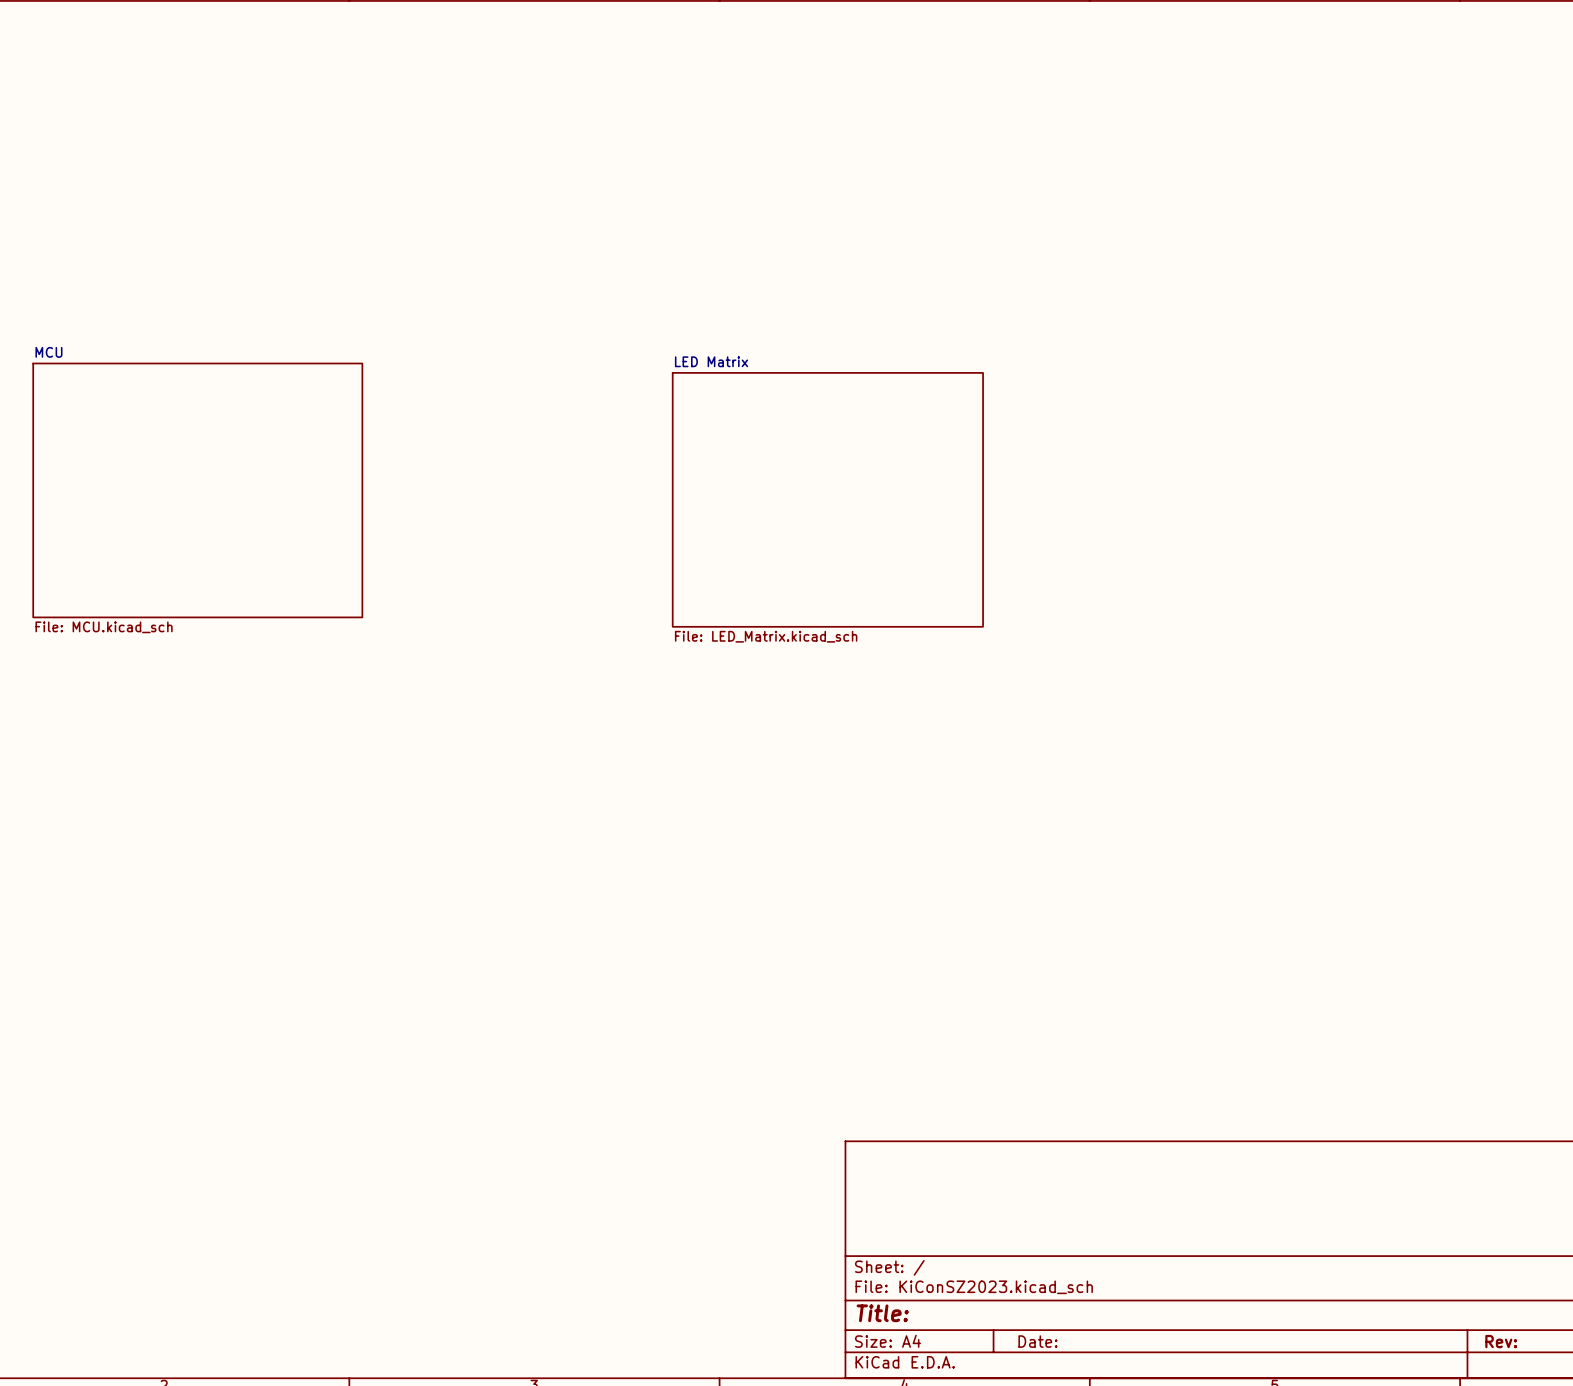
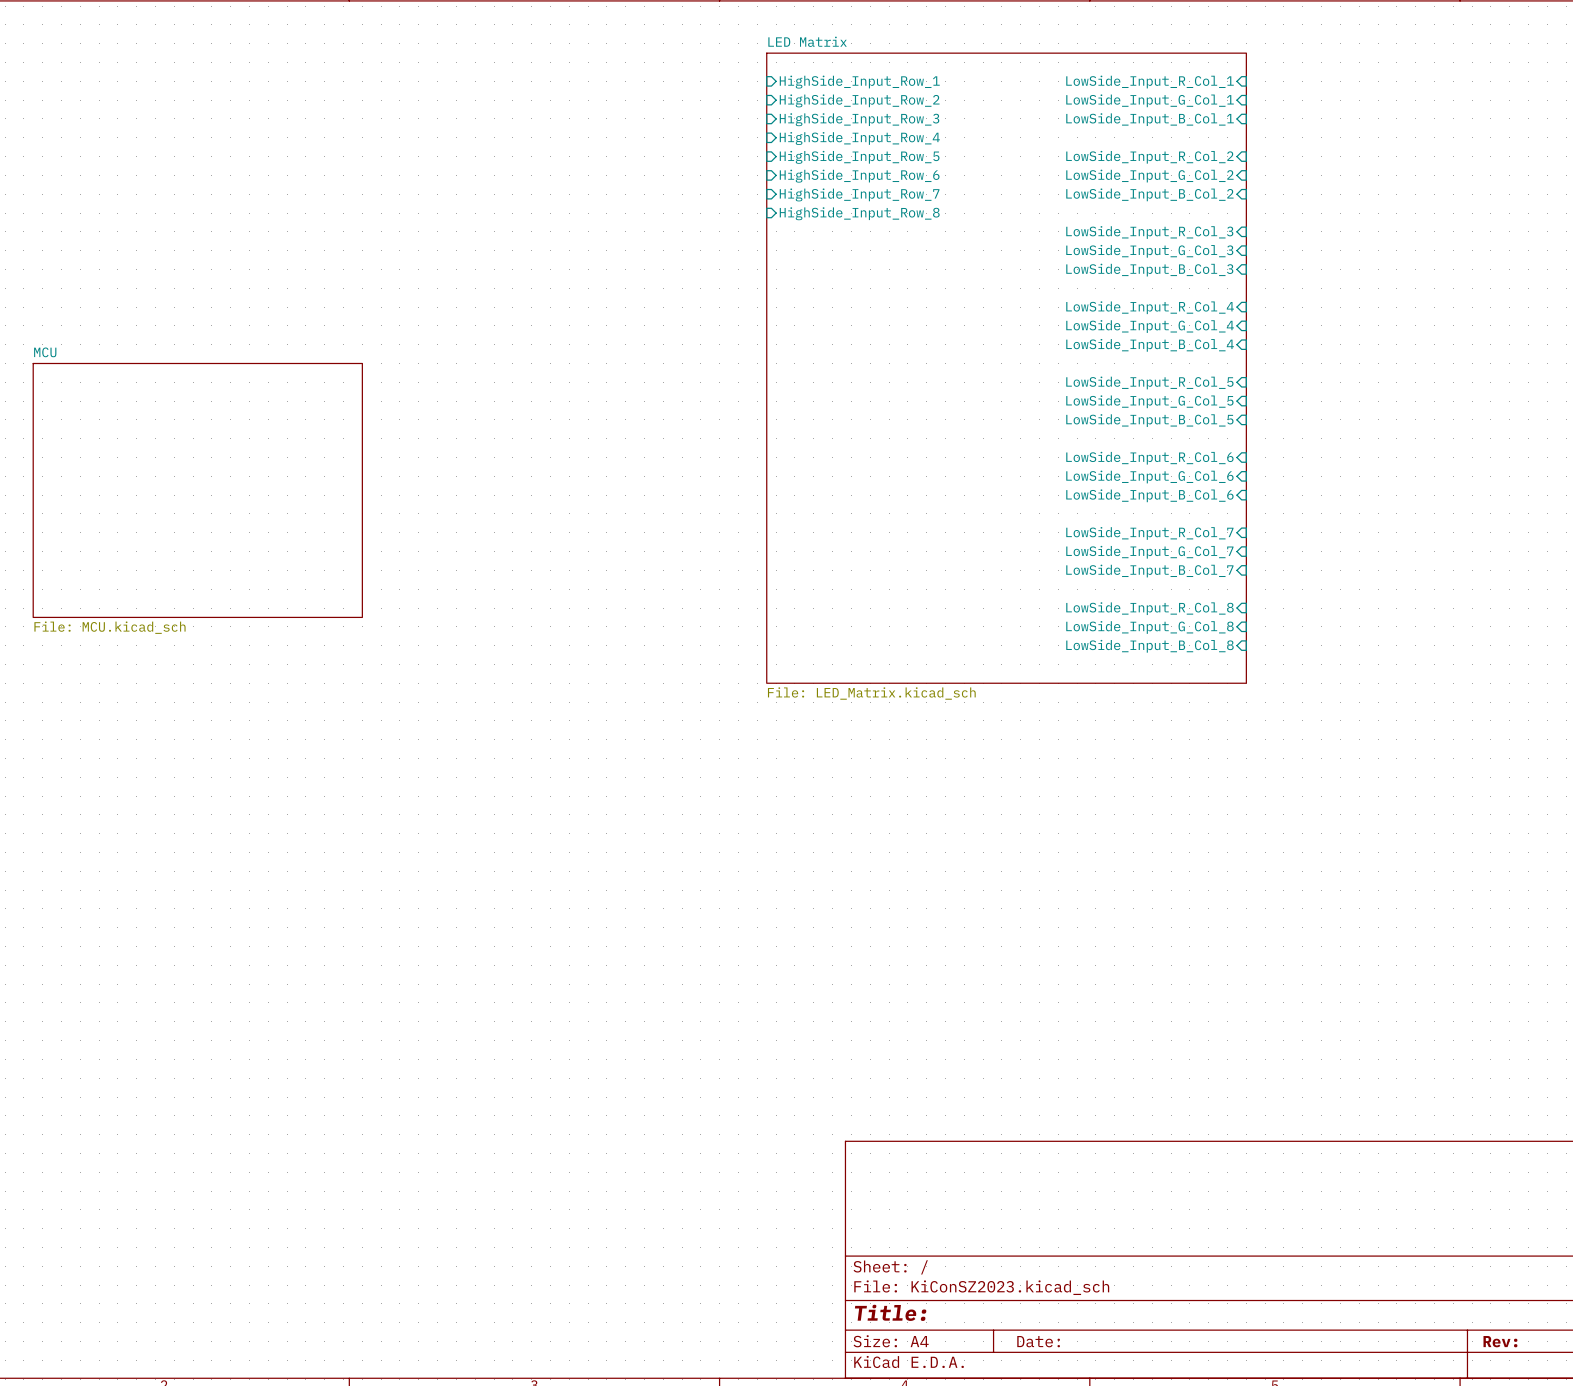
sheet pin: none -> HighSide_Input_Row_1 (859, 82)
sheet pin: none -> LowSide_Input_R_Col_1 (1150, 82)
sheet pin: none -> HighSide_Input_Row_2 (859, 100)
sheet pin: none -> LowSide_Input_G_Col_1 (1150, 100)
sheet pin: none -> HighSide_Input_Row_3 (859, 119)
sheet pin: none -> LowSide_Input_B_Col_1 (1150, 119)
sheet pin: none -> HighSide_Input_Row_4 (859, 138)
sheet pin: none -> HighSide_Input_Row_5 (859, 157)
sheet pin: none -> LowSide_Input_R_Col_2 (1149, 157)
sheet pin: none -> HighSide_Input_Row_6 (859, 176)
sheet pin: none -> LowSide_Input_G_Col_2 (1149, 176)
sheet pin: none -> HighSide_Input_Row_7 (859, 194)
sheet pin: none -> LowSide_Input_B_Col_2 (1149, 194)
sheet pin: none -> HighSide_Input_Row_8 (859, 213)
sheet pin: none -> LowSide_Input_R_Col_3 (1149, 232)
sheet pin: none -> LowSide_Input_G_Col_3 (1149, 251)
sheet pin: none -> LowSide_Input_B_Col_3 (1149, 270)
sheet pin: none -> LowSide_Input_R_Col_4 (1150, 307)
sheet pin: none -> LowSide_Input_G_Col_4 (1150, 326)
sheet pin: none -> LowSide_Input_B_Col_4 (1150, 345)
sheet LED Matrix: none -> File: LED_Matrix.kicad_sch (1006, 368)
sheet pin: none -> LowSide_Input_R_Col_5 (1149, 382)
sheet pin: none -> LowSide_Input_G_Col_5 (1149, 401)
sheet pin: none -> LowSide_Input_B_Col_5 (1149, 420)
sheet pin: none -> LowSide_Input_R_Col_6 (1149, 458)
sheet pin: none -> LowSide_Input_G_Col_6 (1149, 477)
sheet pin: none -> LowSide_Input_B_Col_6 (1149, 495)
sheet LED Matrix: File: LED_Matrix.kicad_sch (827, 499) -> none
sheet pin: none -> LowSide_Input_R_Col_7 (1149, 533)
sheet pin: none -> LowSide_Input_G_Col_7 (1149, 552)
sheet pin: none -> LowSide_Input_B_Col_7 (1149, 571)
sheet pin: none -> LowSide_Input_R_Col_8 (1149, 608)
sheet pin: none -> LowSide_Input_G_Col_8 (1149, 627)
sheet pin: none -> LowSide_Input_B_Col_8 (1149, 646)

